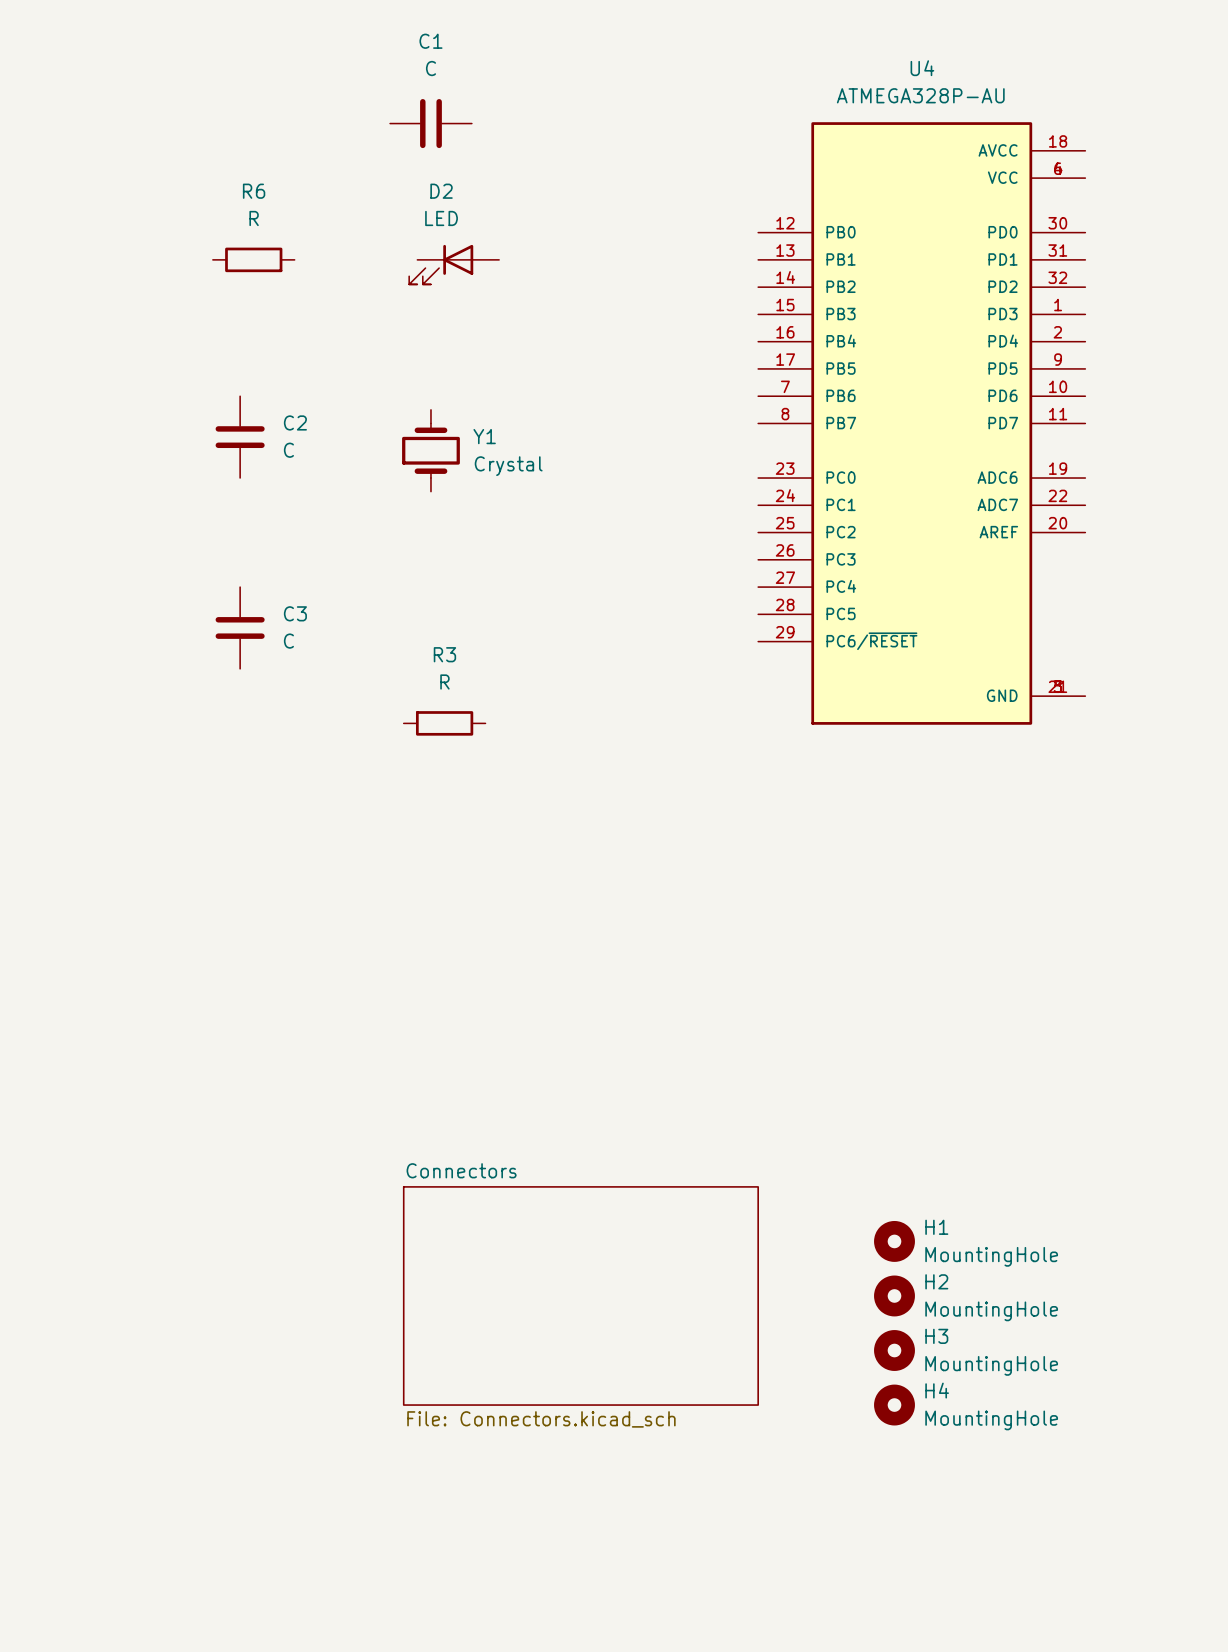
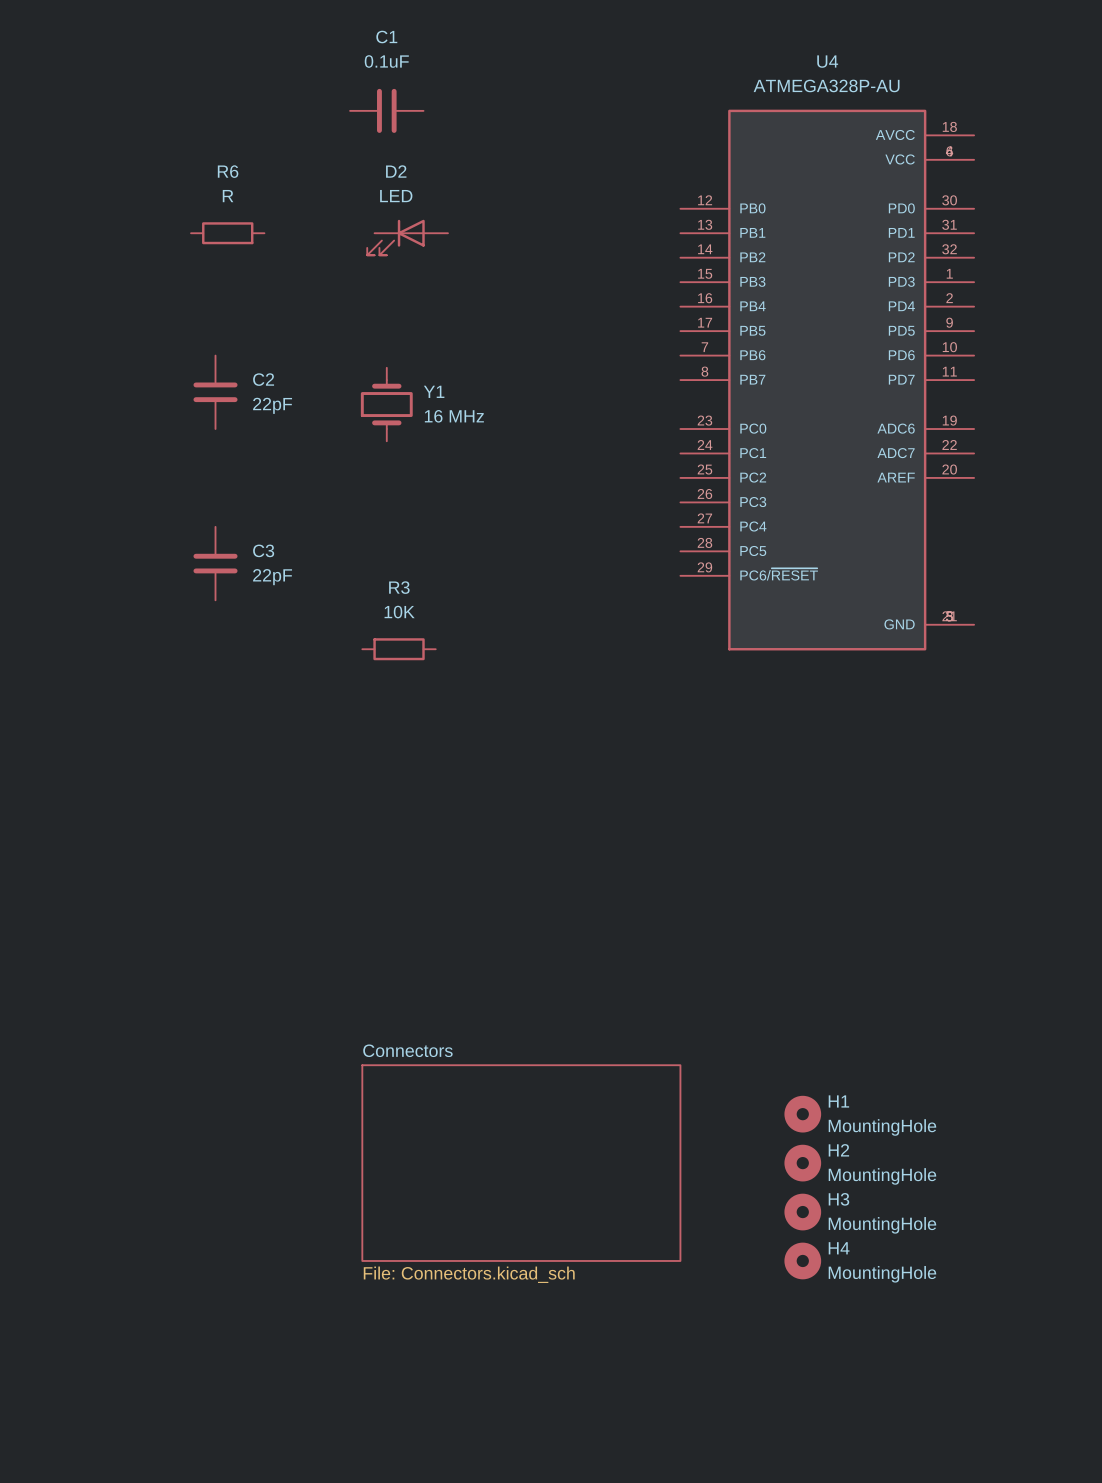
C1 value: C (430, 68) -> 0.1uF (386, 61)
C2 value: C (288, 450) -> 22pF (272, 405)
Y1 value: Crystal (508, 466) -> 16 MHz (454, 416)
C3 value: C (288, 641) -> 22pF (272, 577)
R3 value: R (444, 681) -> 10K (399, 612)

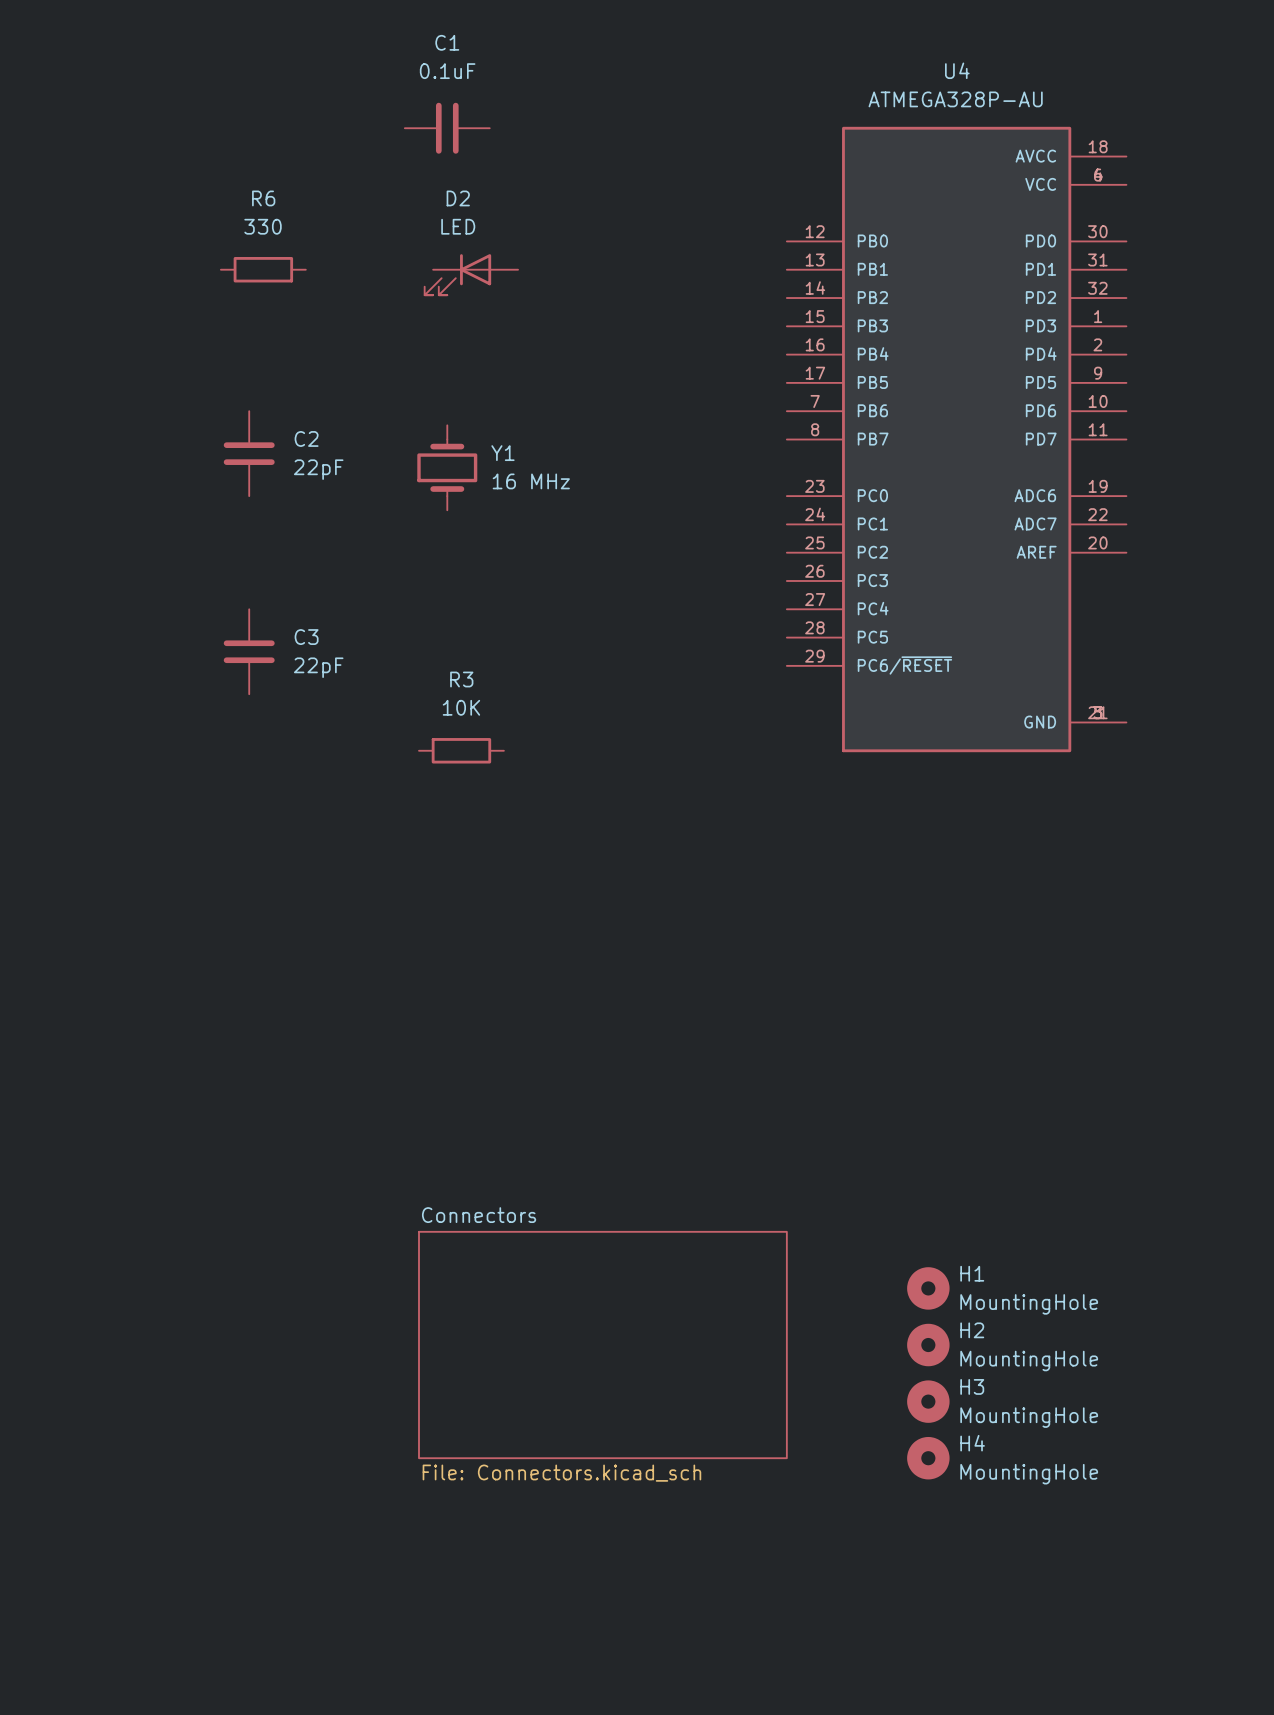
R6 value: R (228, 196) -> 330 (263, 226)

